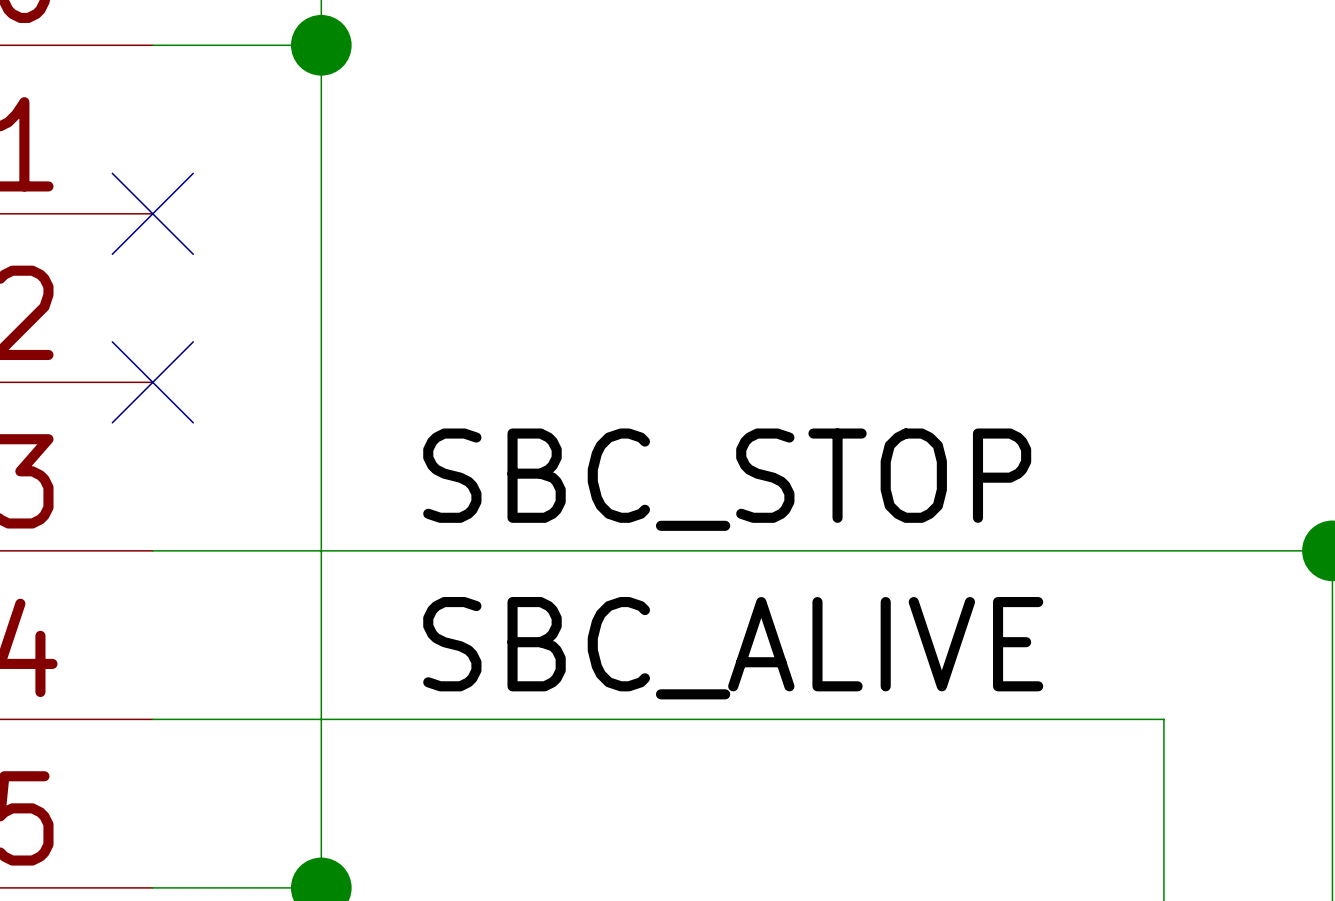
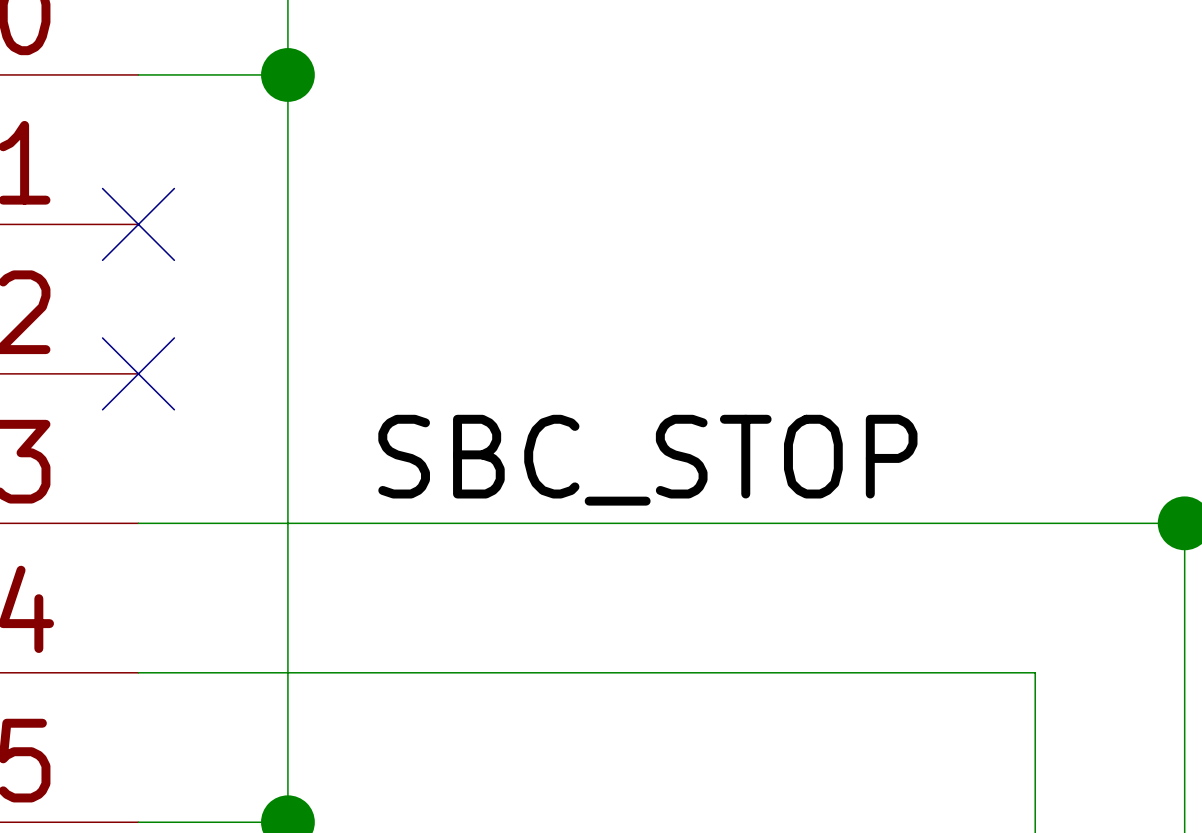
label: SBC_ALIVE (733, 648) -> none

